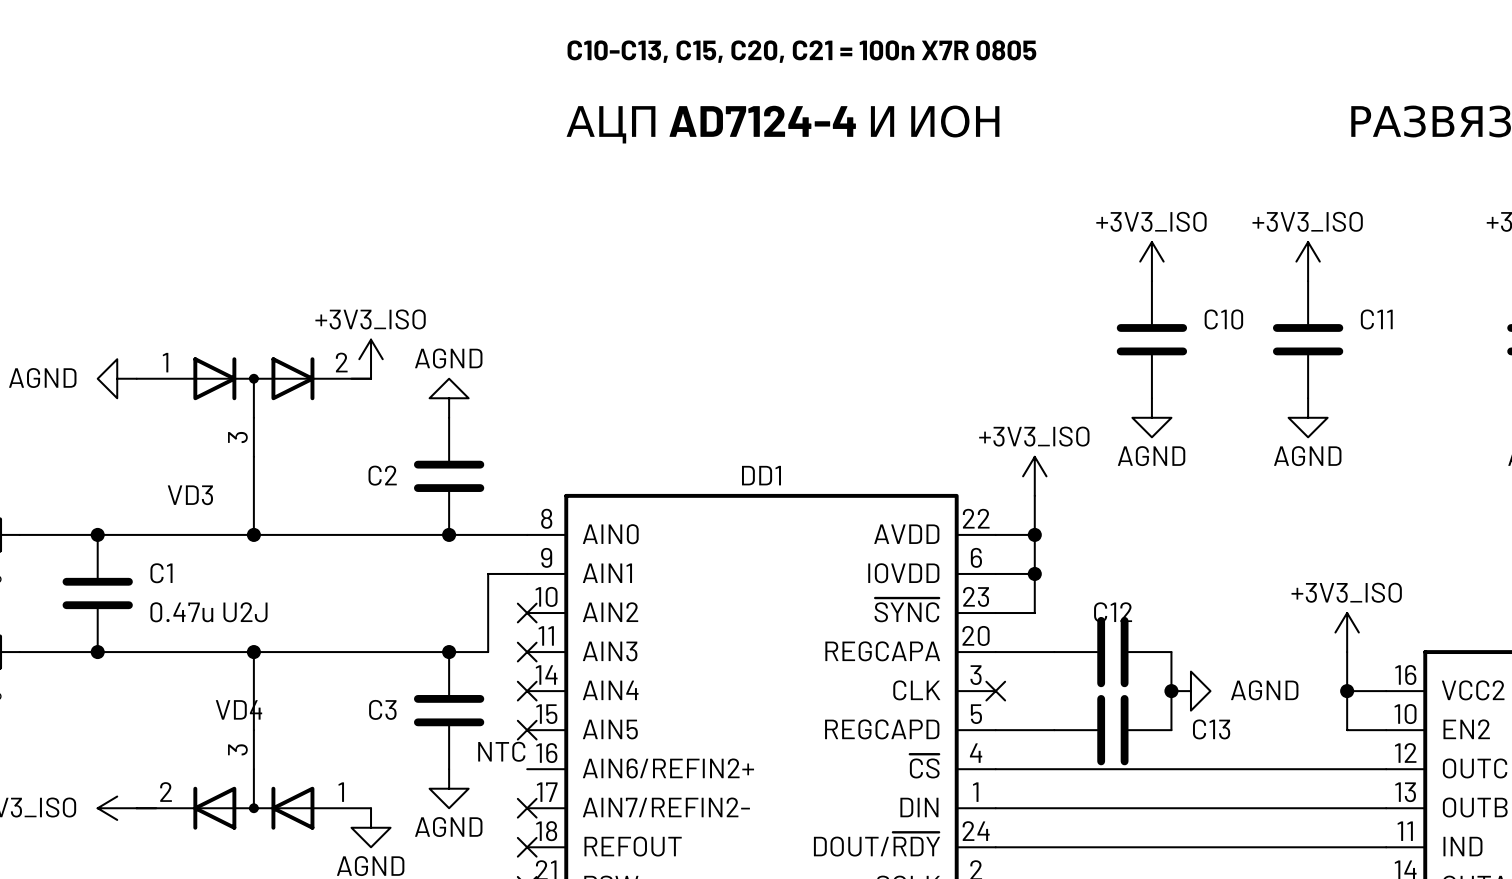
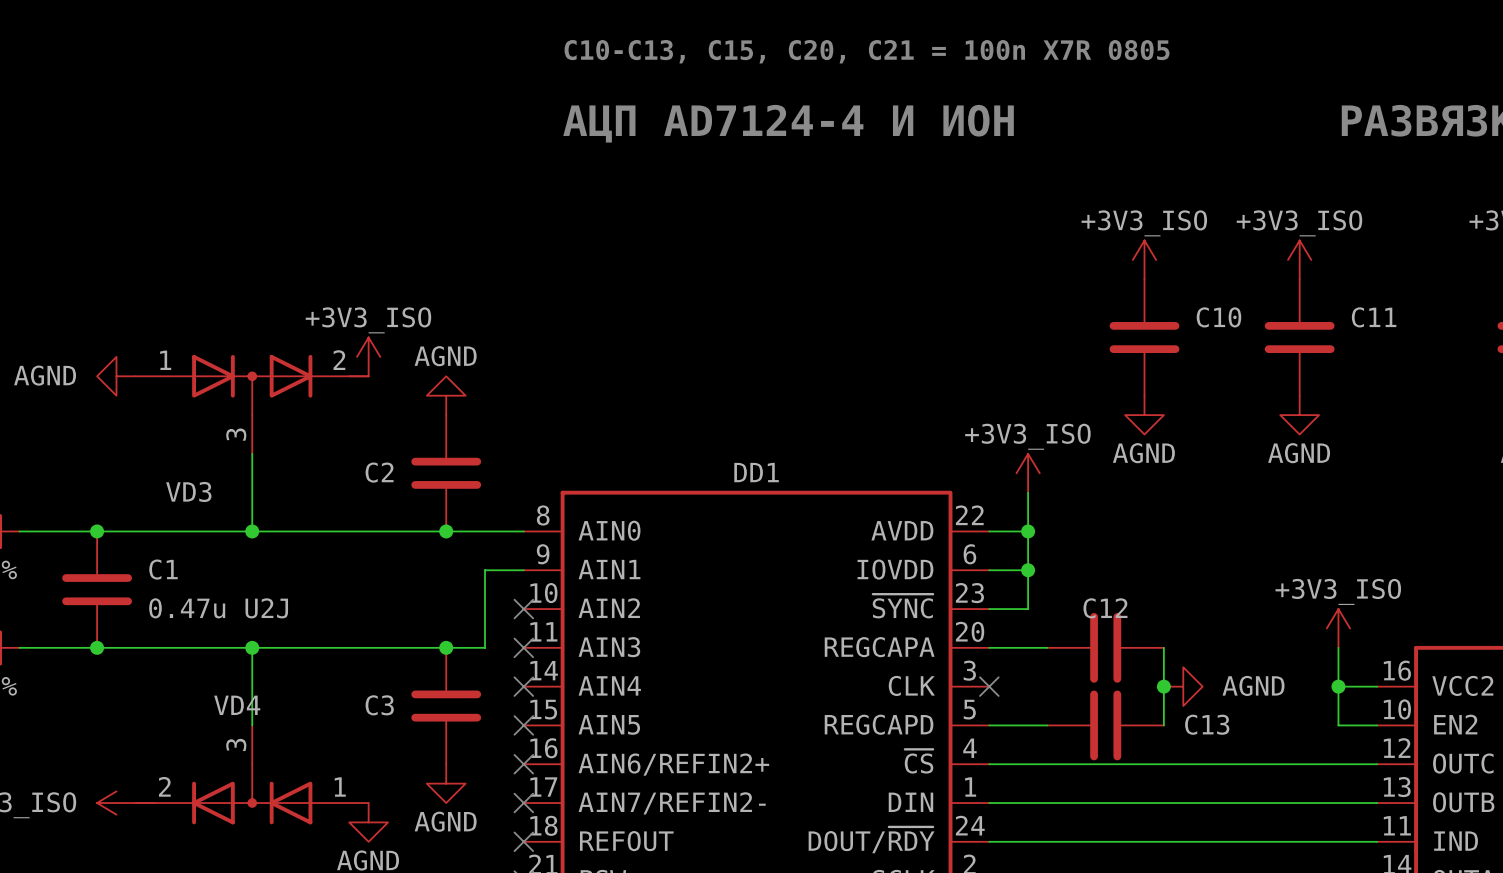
label: NTC (501, 751) -> none
no-connect mark: none -> (523, 764)

